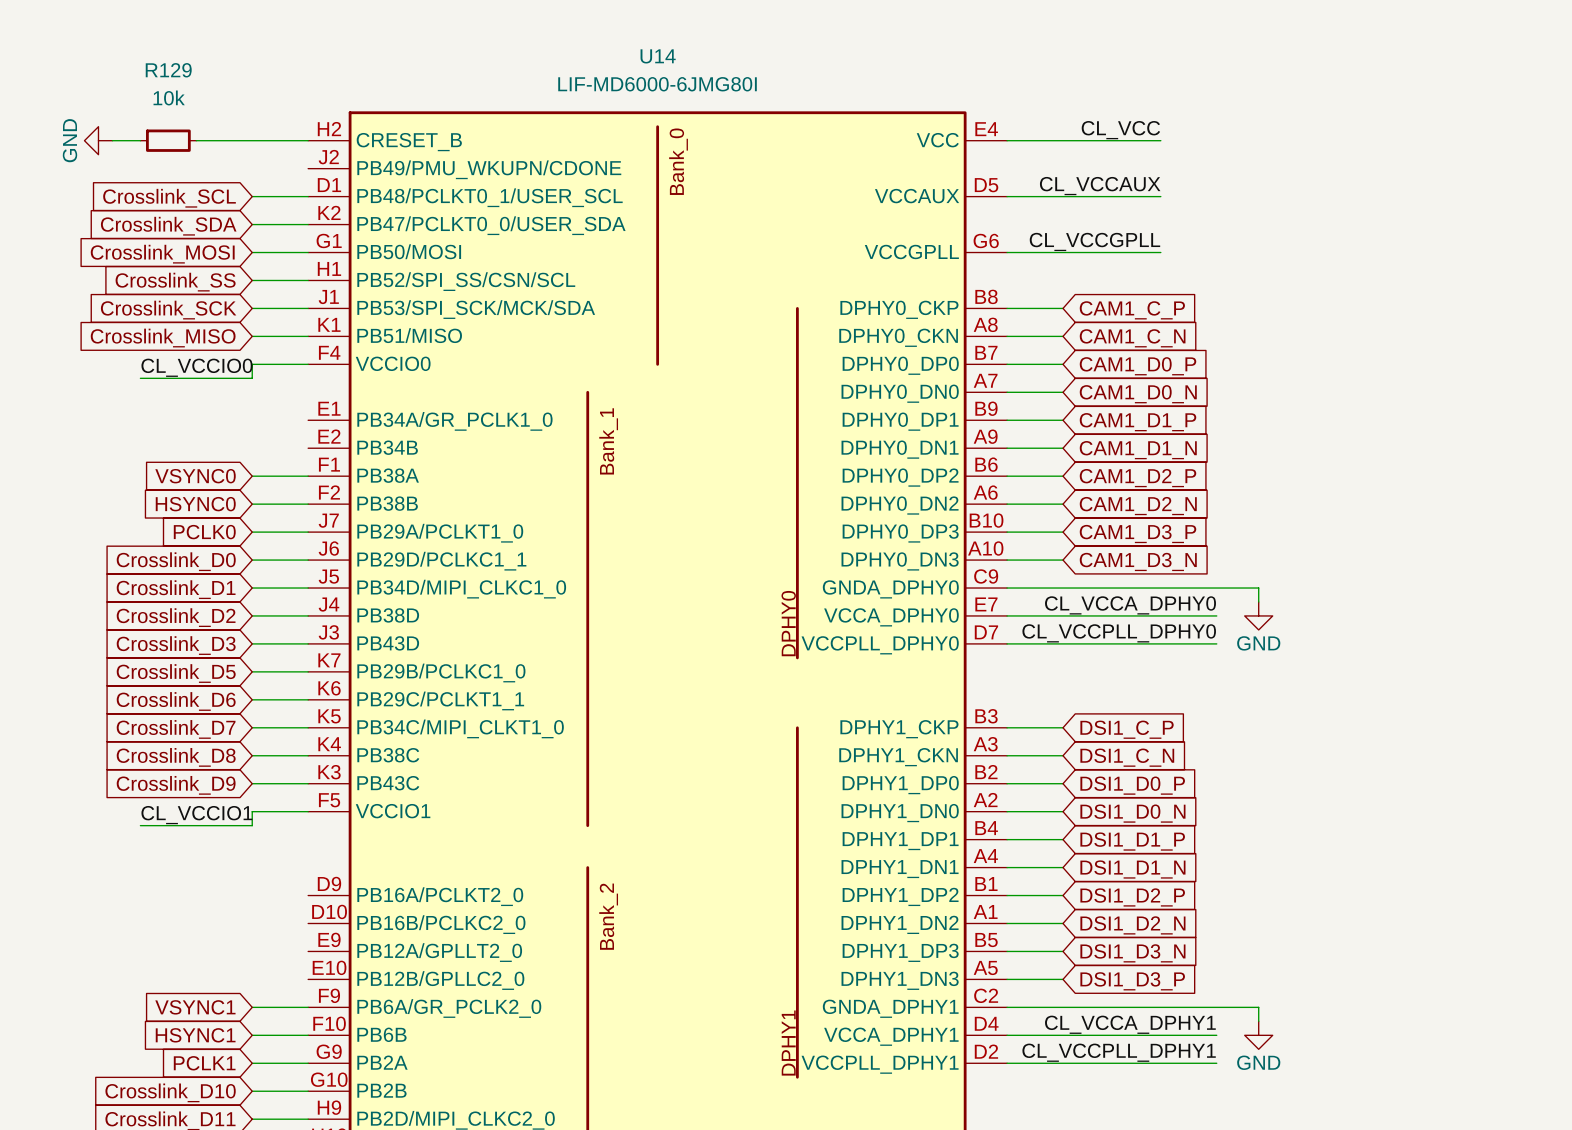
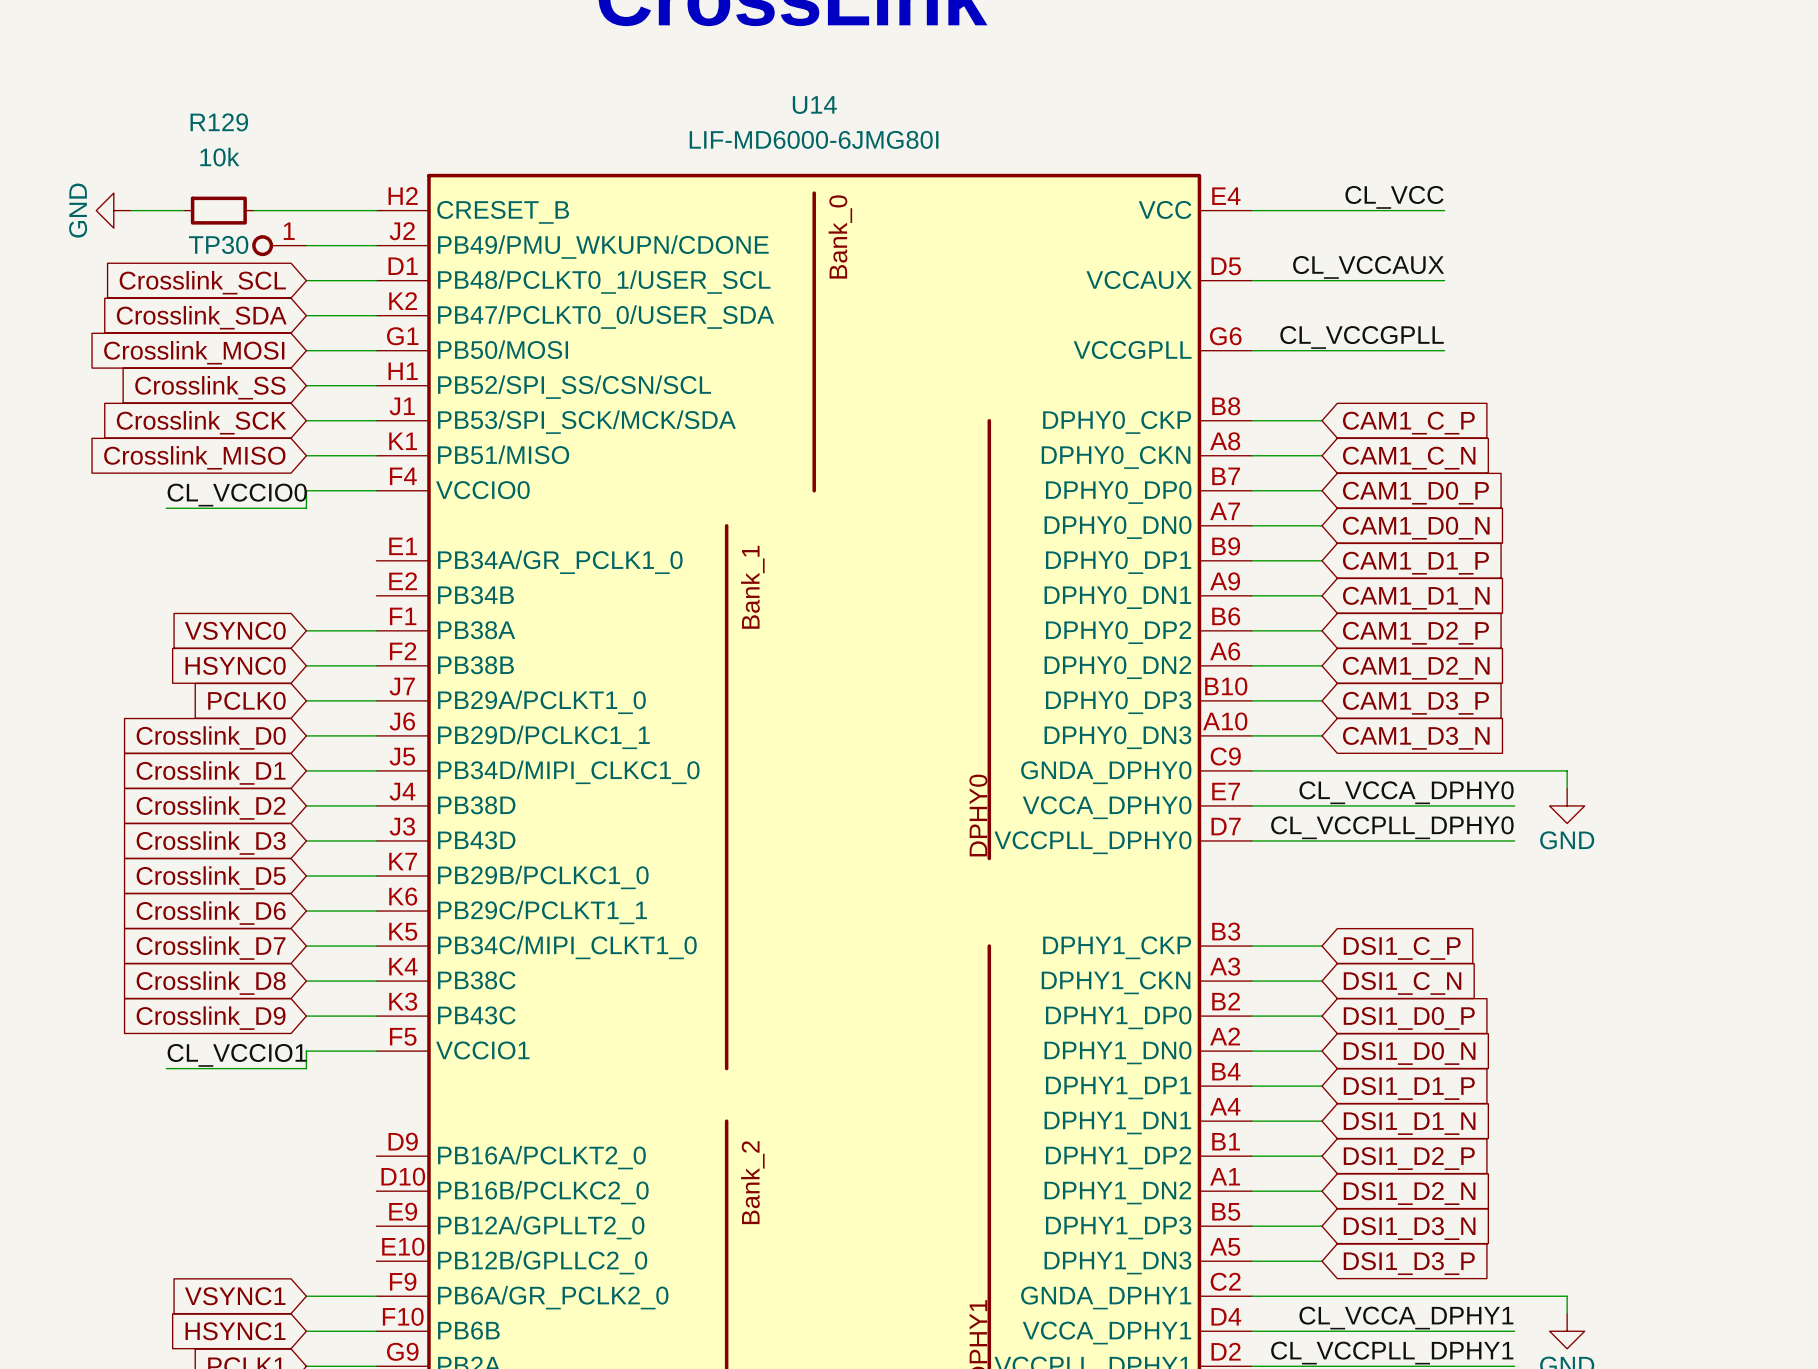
R129 position: (168, 140) -> (218, 210)
TP30: none -> (279, 245)
wire: none -> (306, 245) (376, 245)

